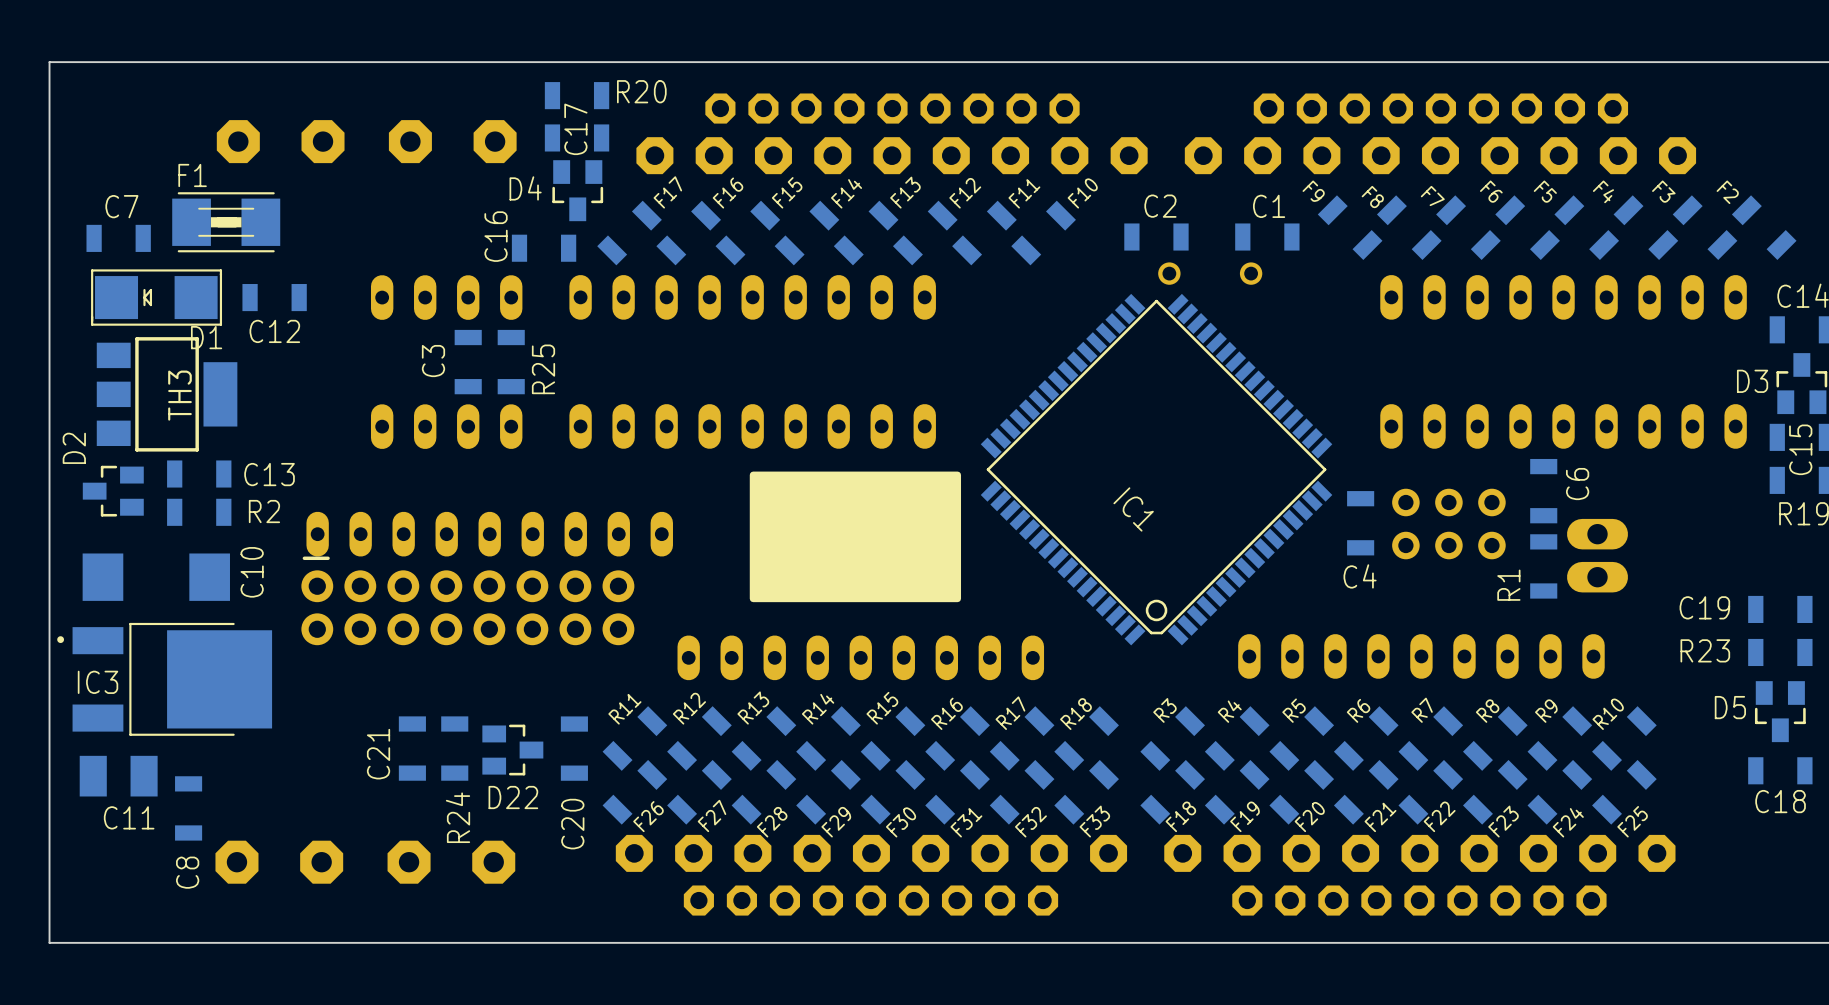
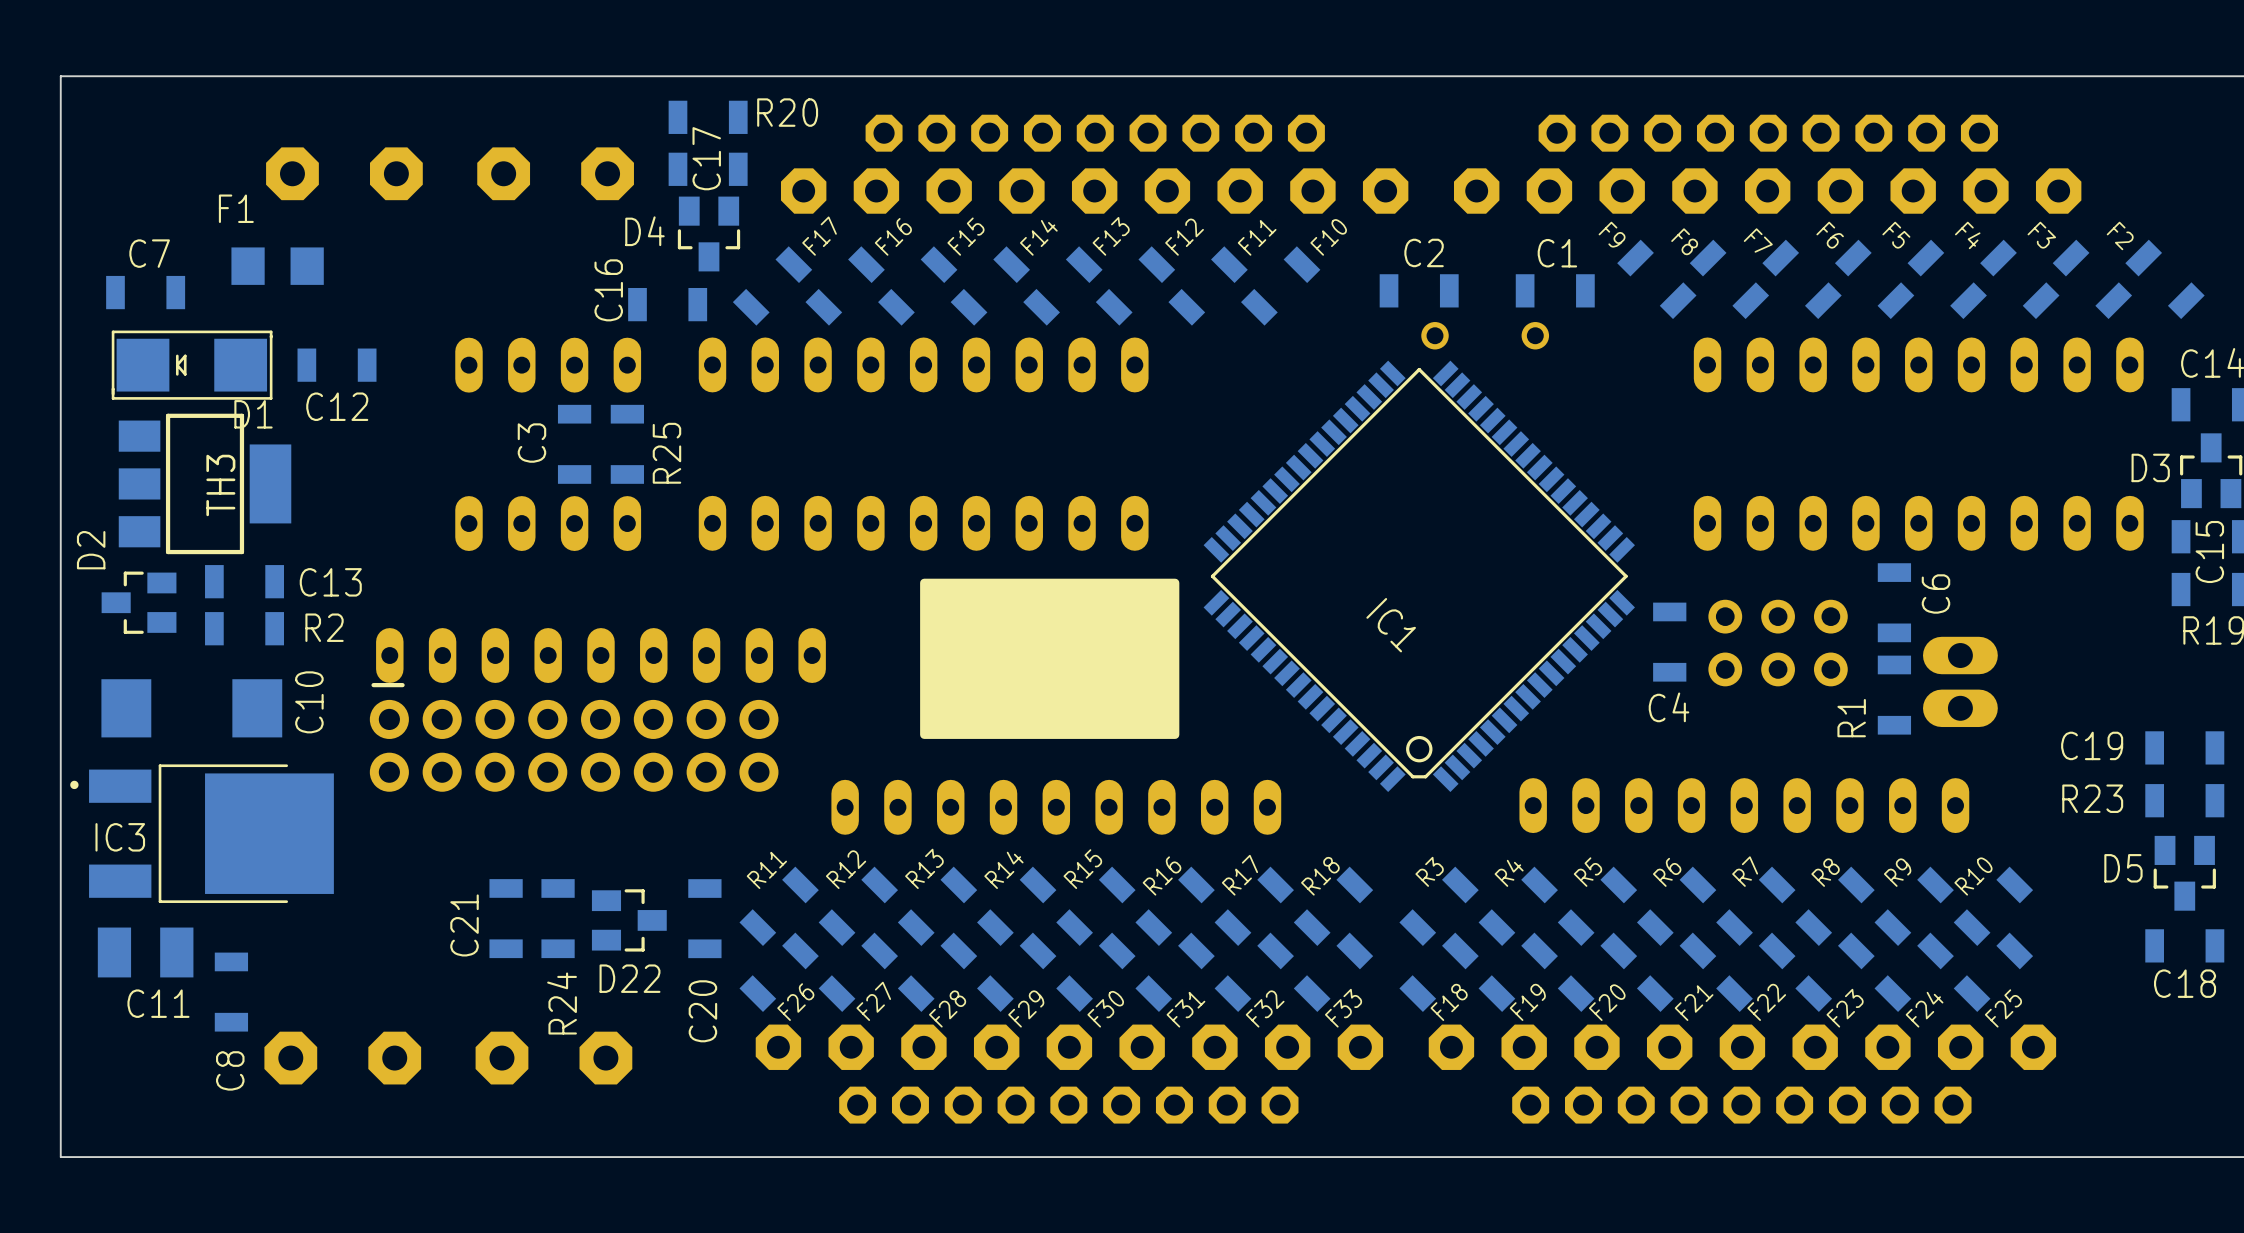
F1 footprint: [172, 192, 281, 253] -> [231, 247, 324, 285]

